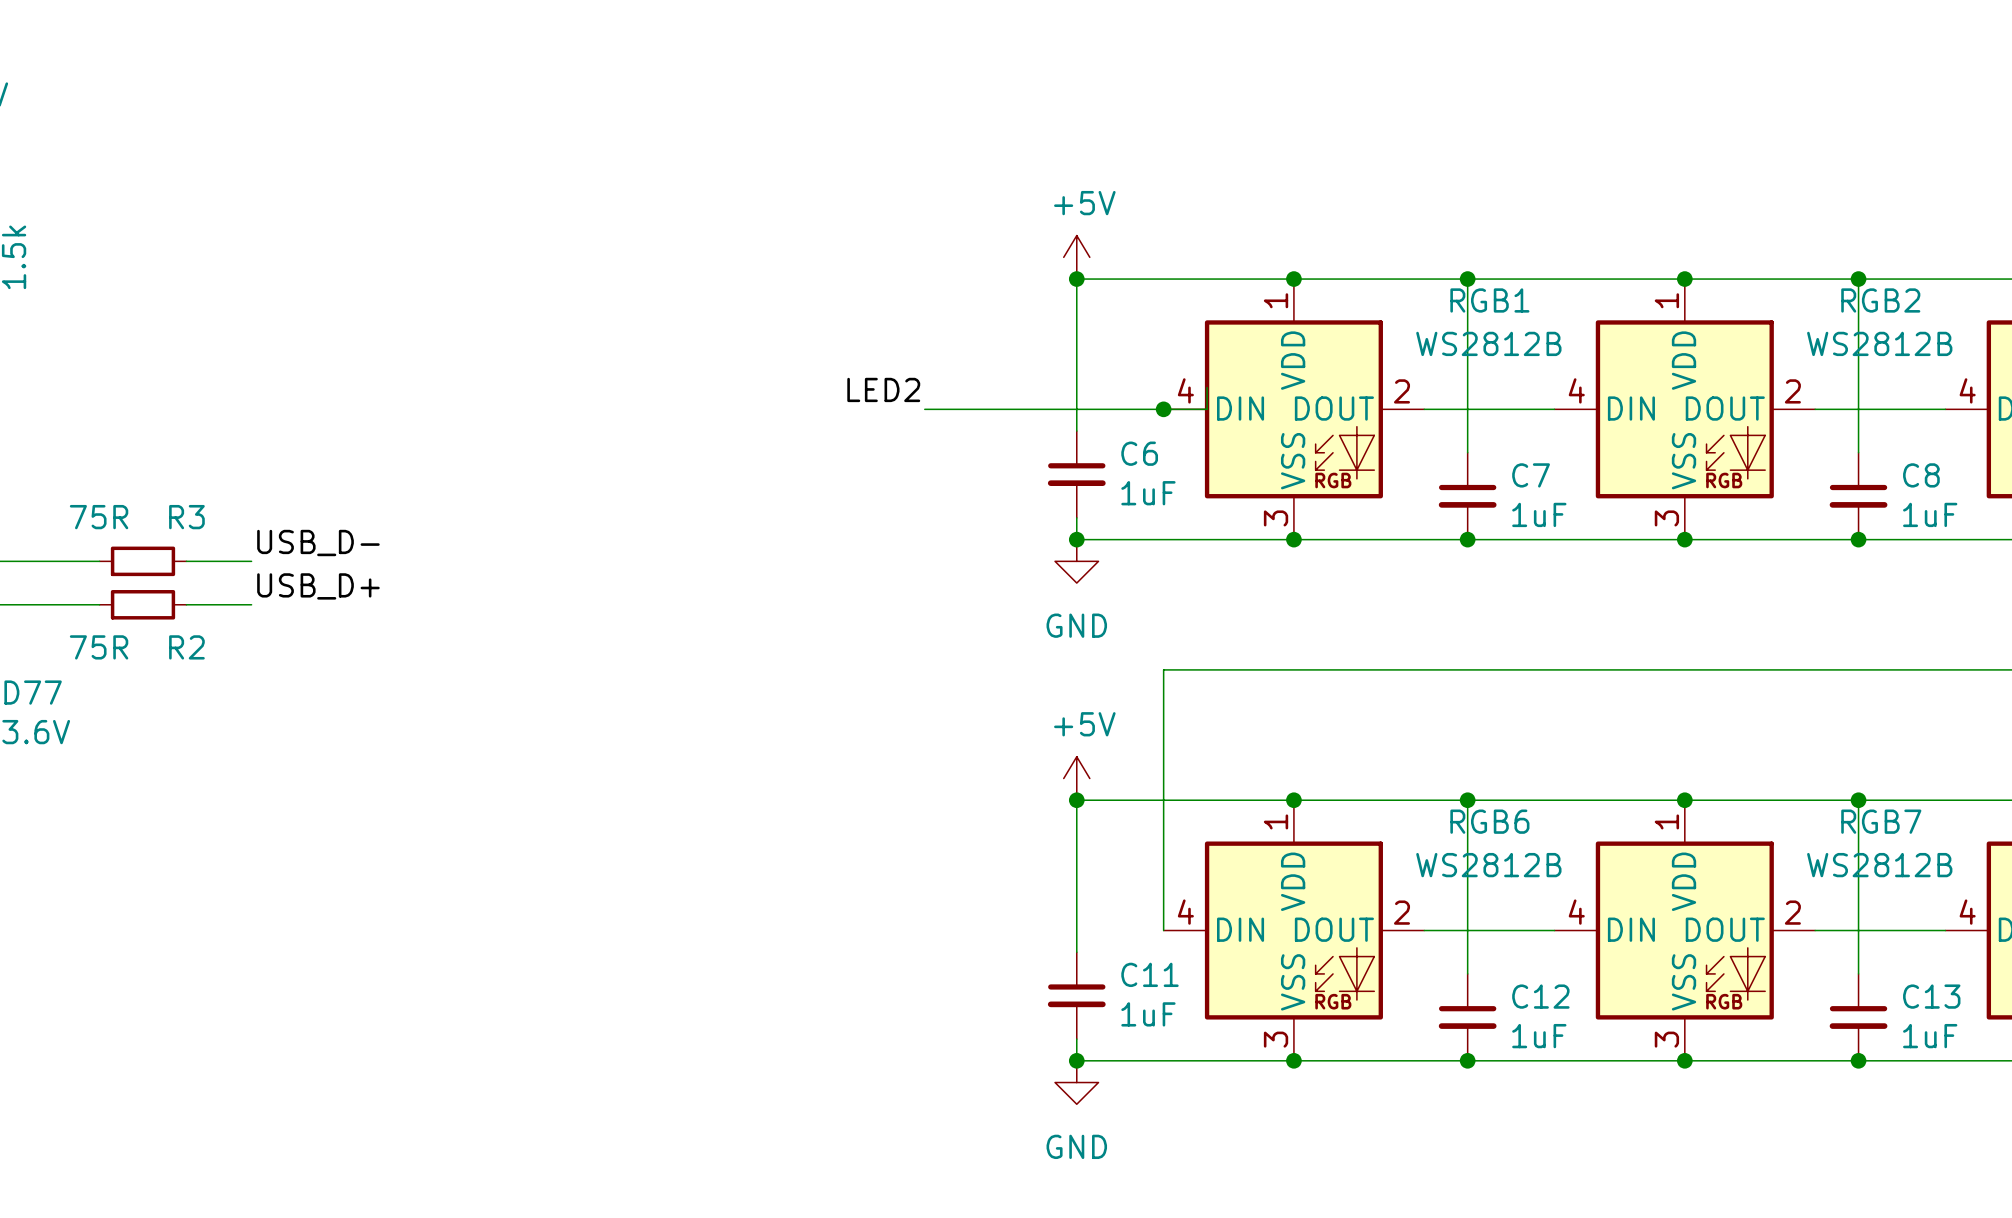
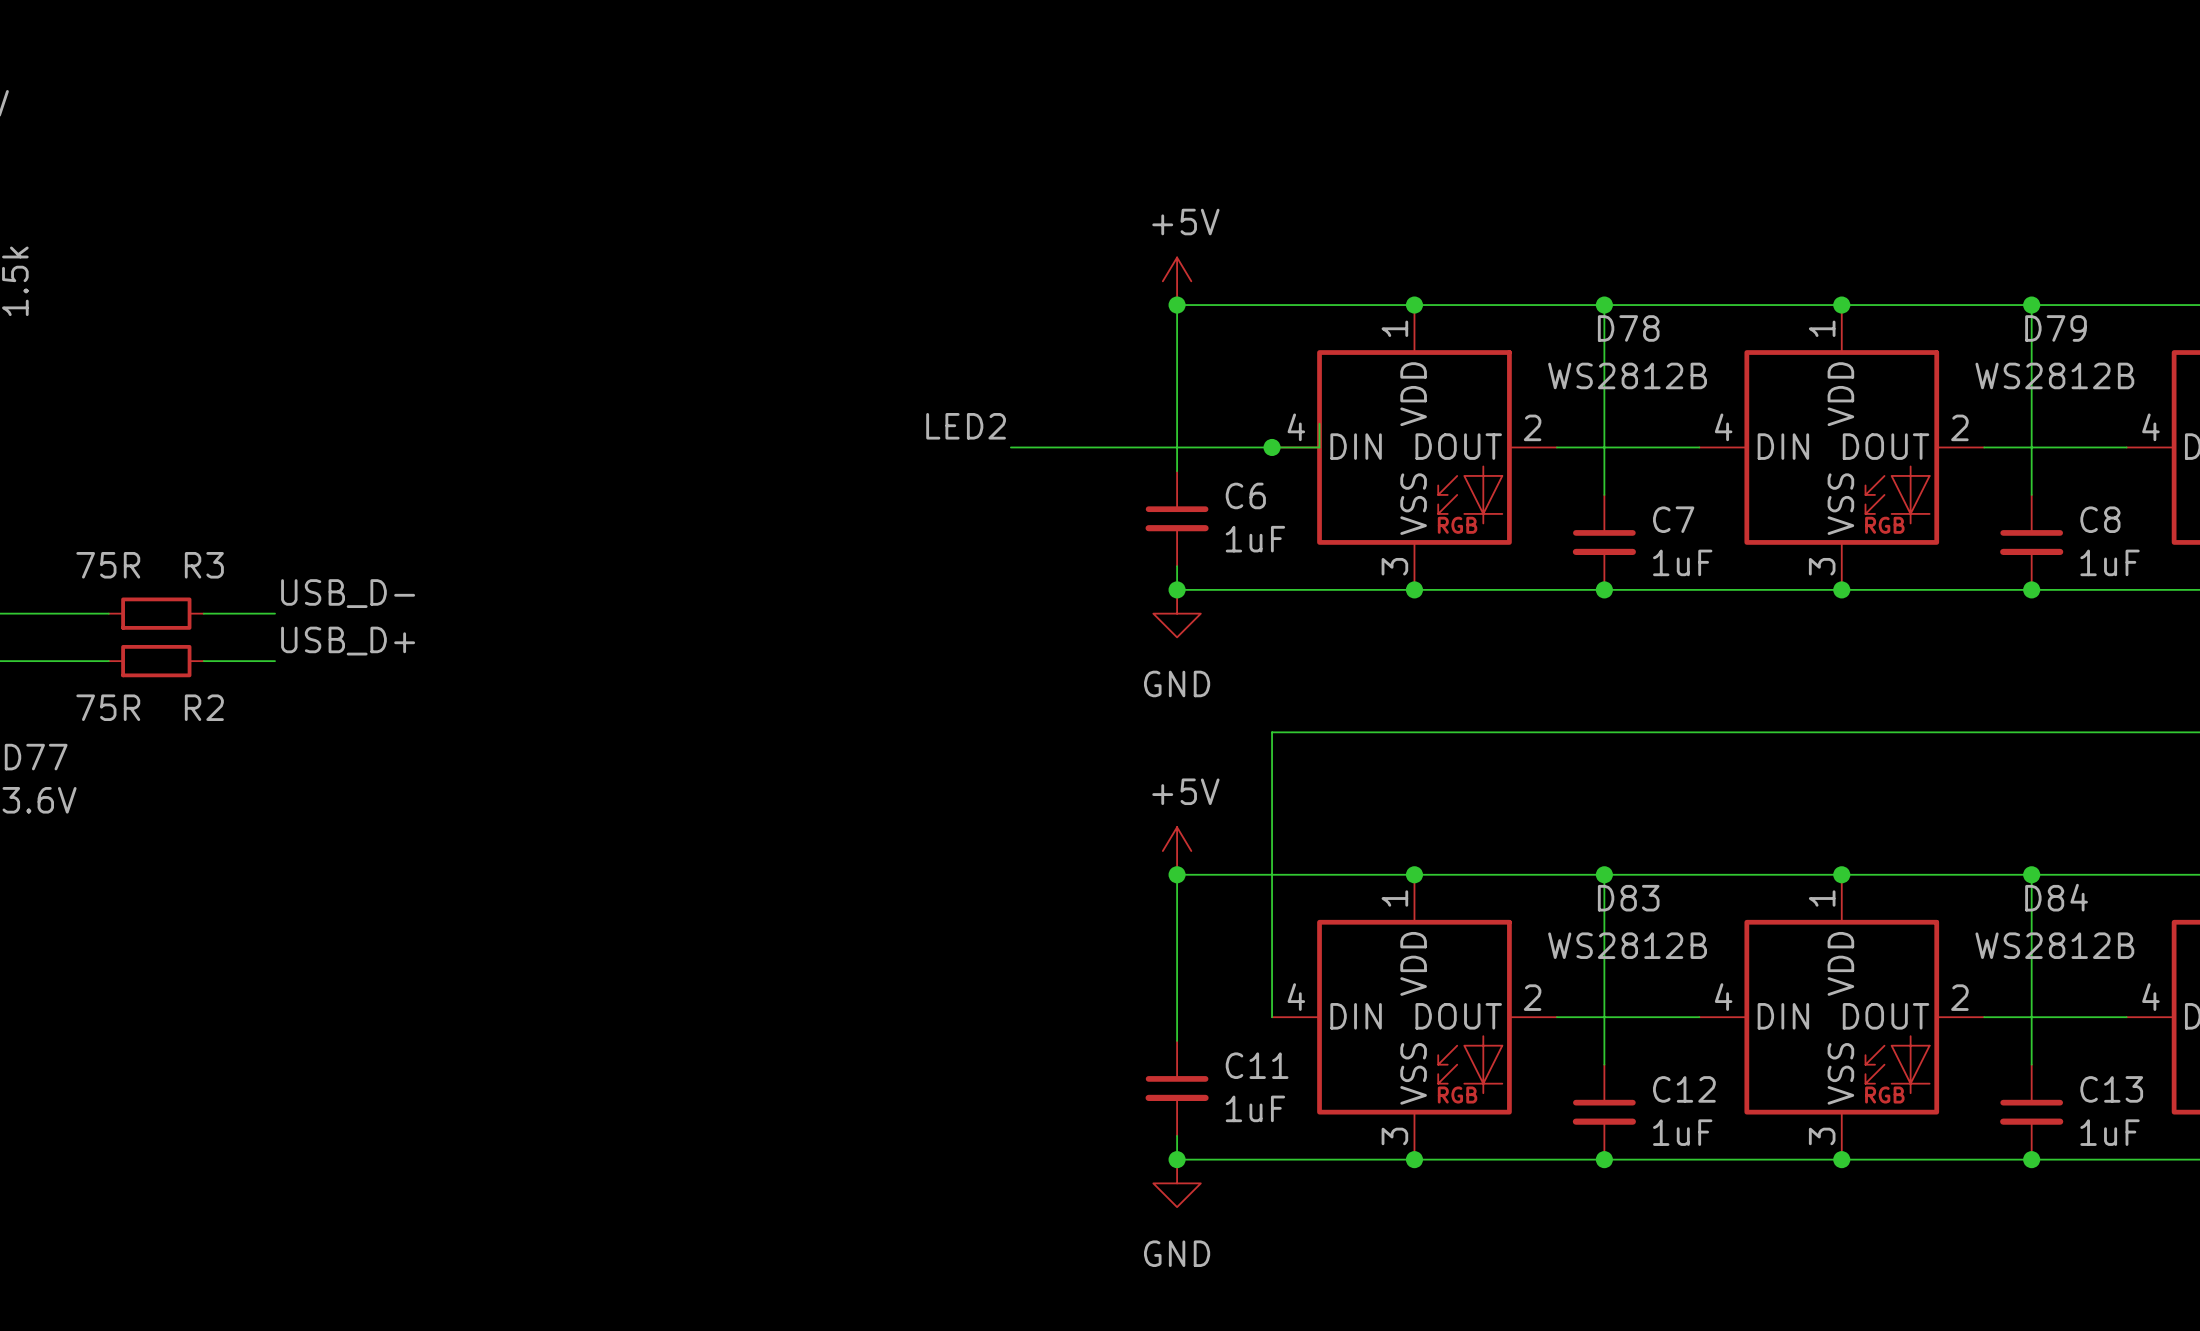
RGB1 name: RGB1 (1489, 300) -> D78 (1628, 328)
RGB2 name: RGB2 (1880, 300) -> D79 (2055, 328)
RGB6 name: RGB6 (1489, 821) -> D83 (1628, 898)
RGB7 name: RGB7 (1881, 821) -> D84 (2056, 897)

